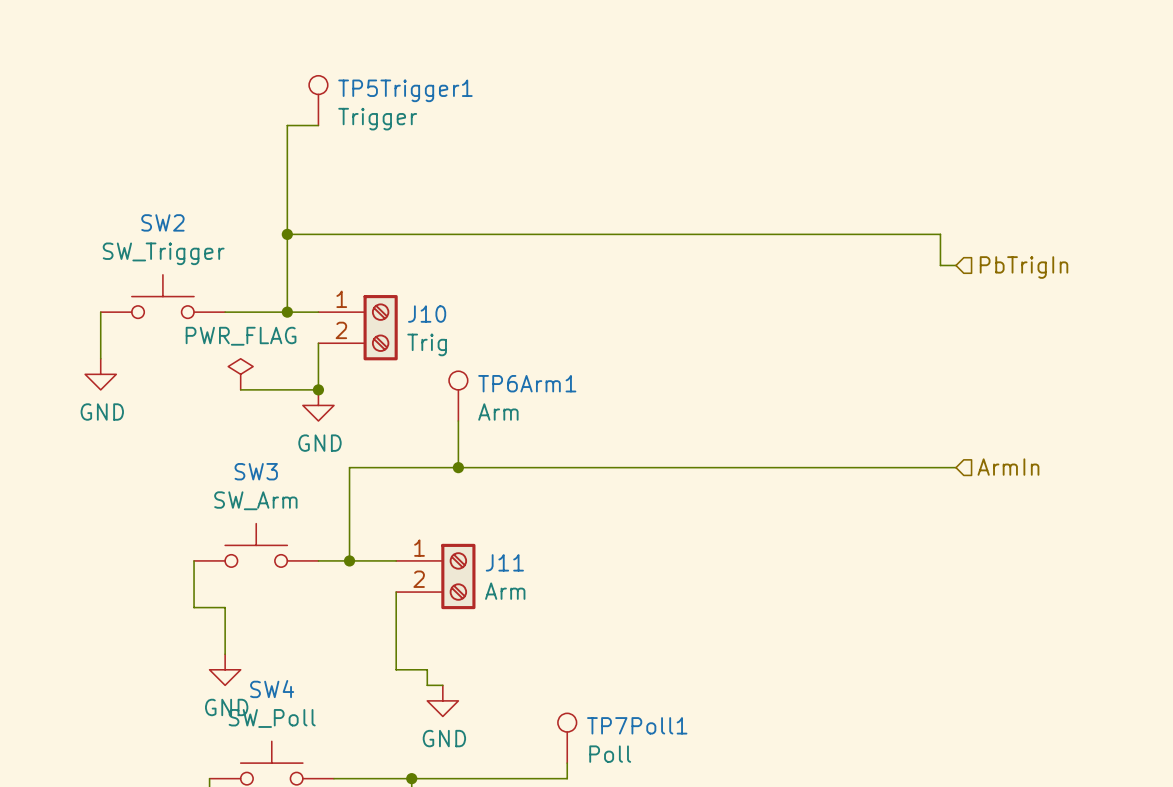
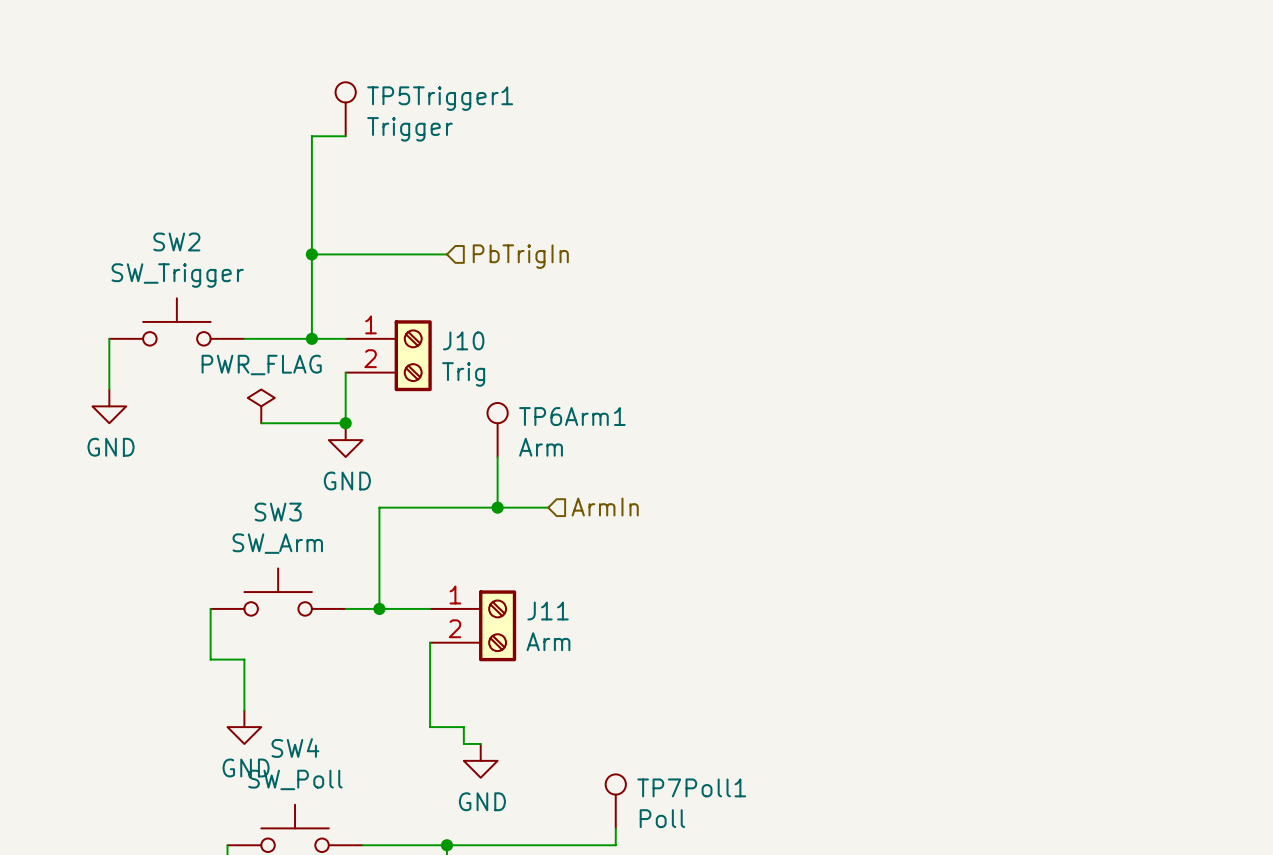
wire: (411, 234) (940, 234) (940, 265) (956, 265) -> none
hierarchical label: none -> PbTrigIn (520, 256)
hierarchical label: PbTrigIn (1024, 267) -> none
wire: (505, 467) (956, 467) -> none
hierarchical label: none -> ArmIn (605, 507)
hierarchical label: ArmIn (1008, 467) -> none

